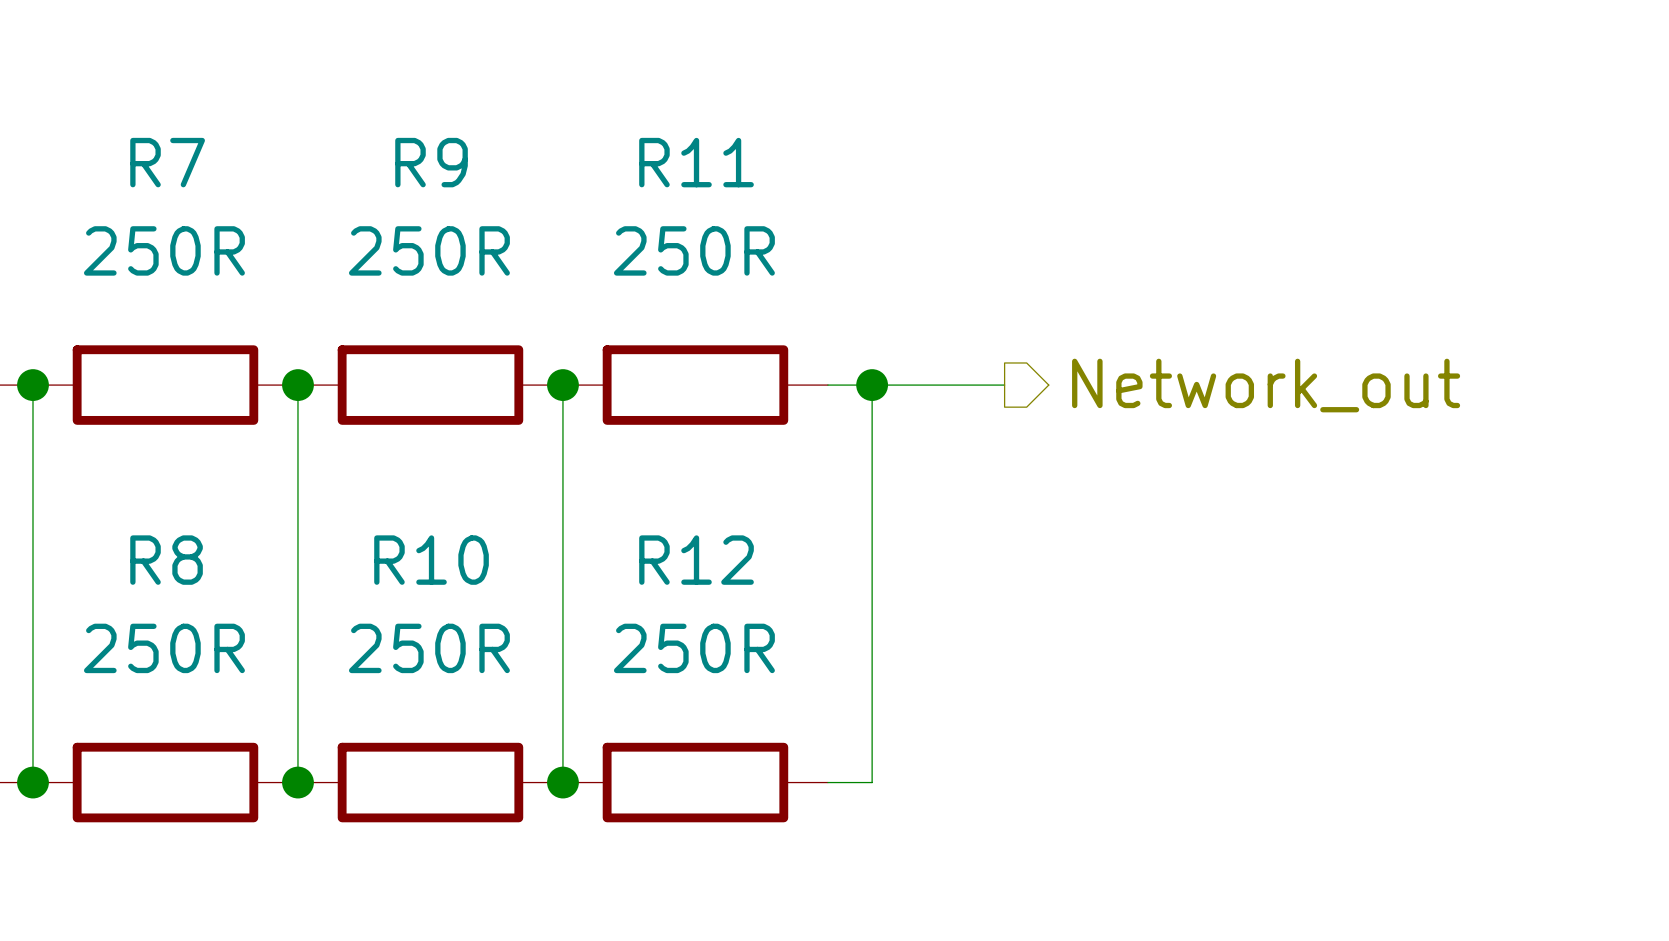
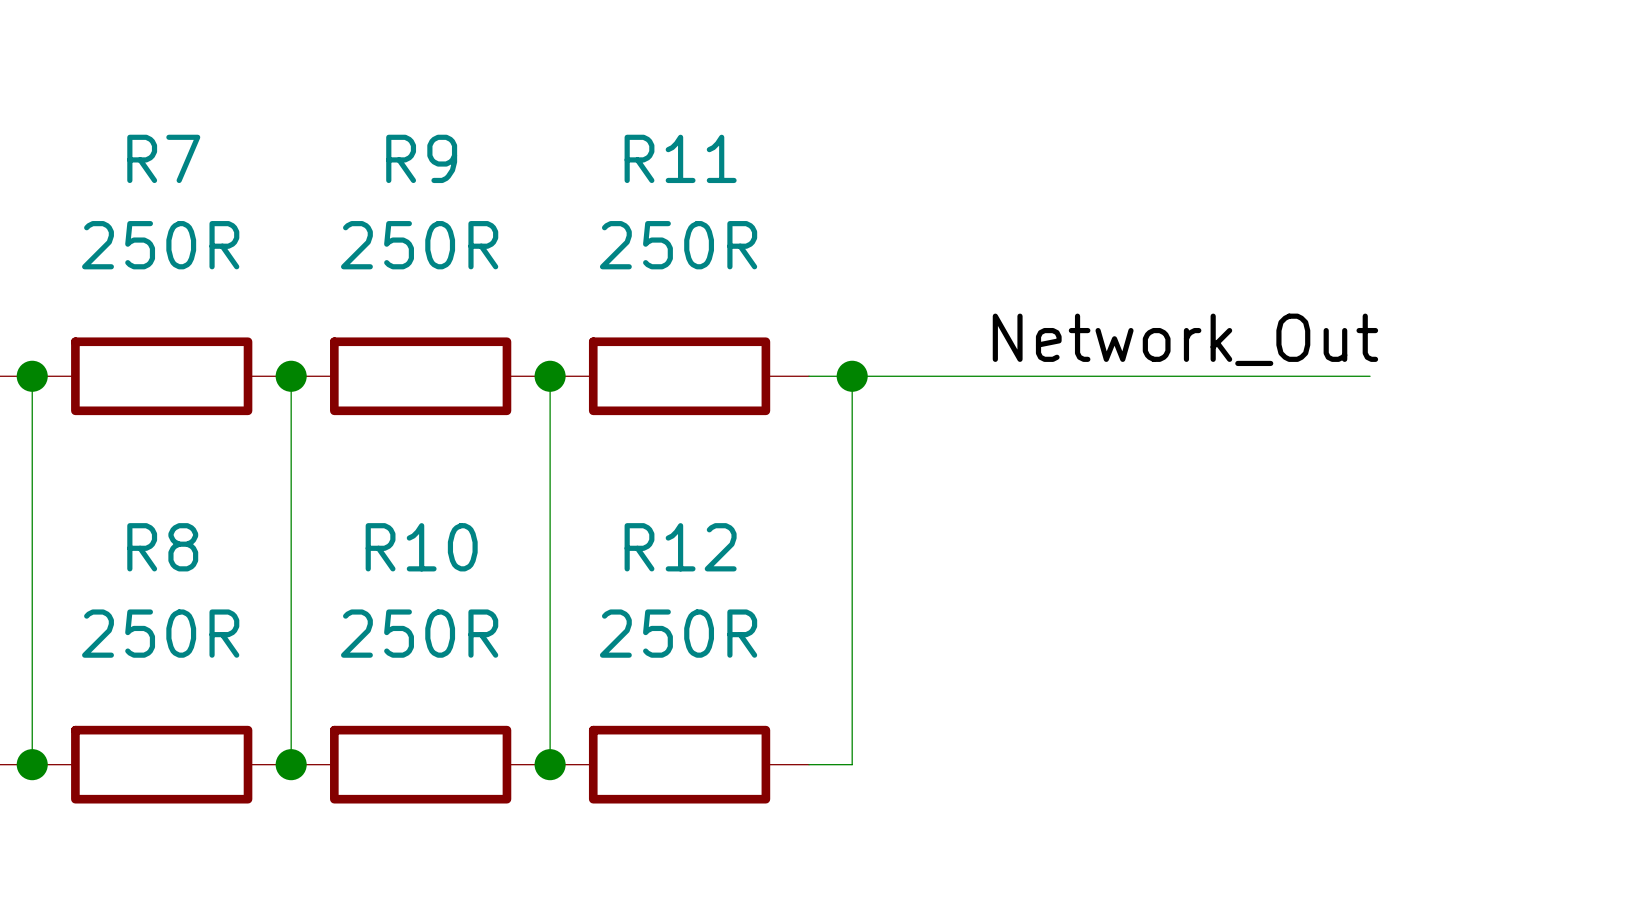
label: none -> Network_Out (1185, 339)
wire: none -> (981, 376) (1370, 376)
hierarchical label: Network_out (1266, 385) -> none

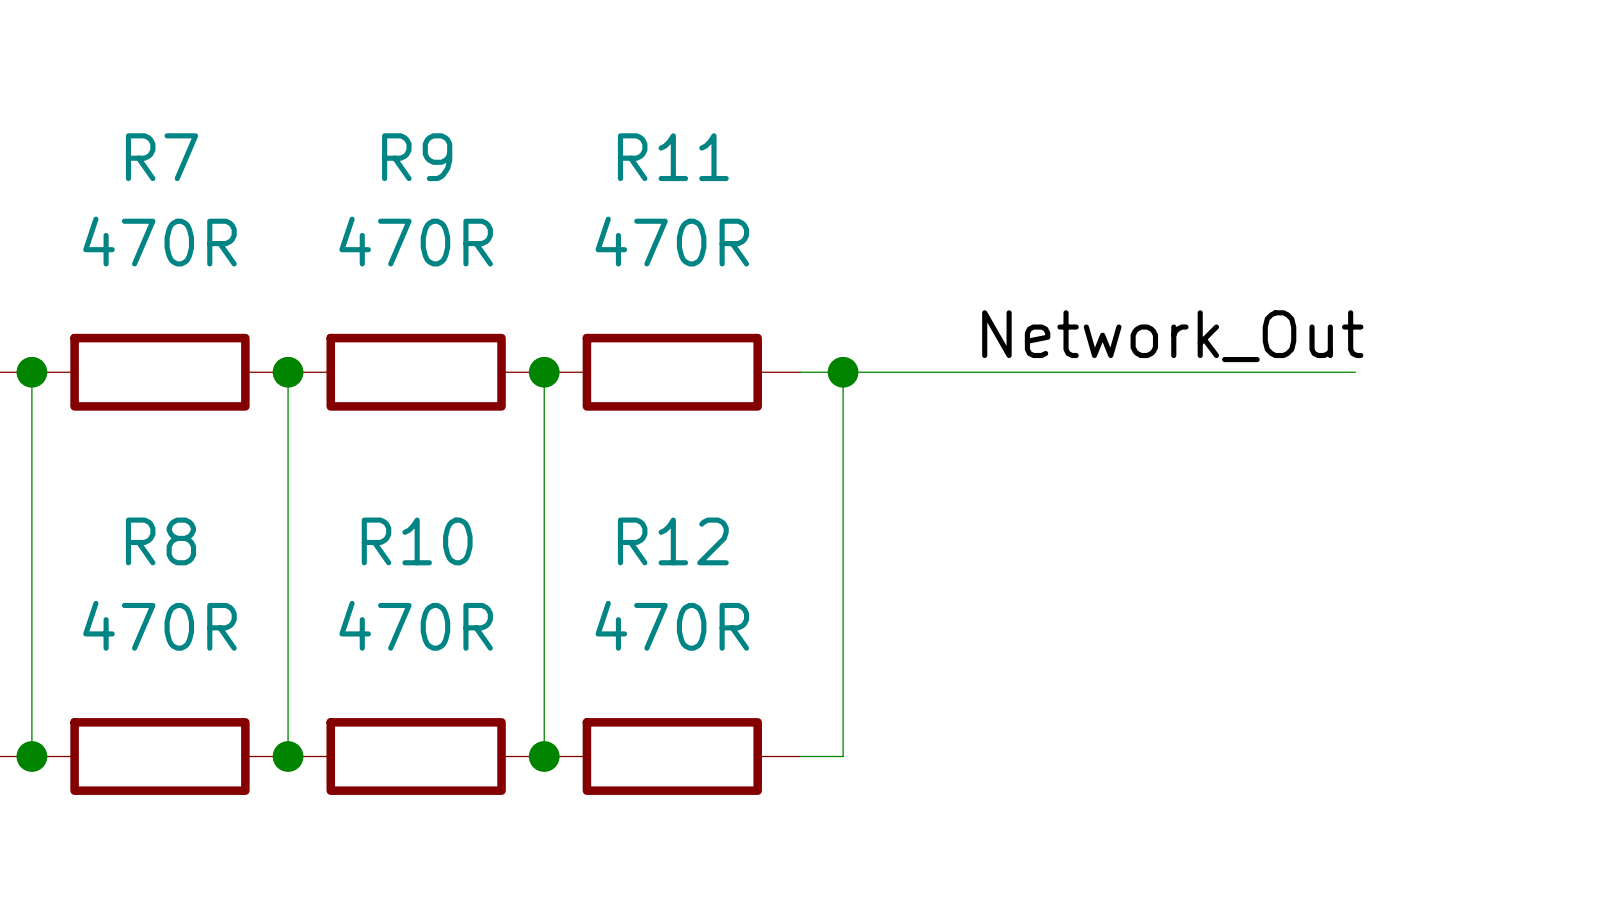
R7 value: 250R (160, 245) -> 470R (159, 241)
R9 value: 250R (419, 245) -> 470R (416, 241)
R11 value: 250R (678, 245) -> 470R (672, 241)
R8 value: 250R (160, 633) -> 470R (159, 625)
R10 value: 250R (419, 633) -> 470R (416, 625)
R12 value: 250R (678, 633) -> 470R (672, 625)

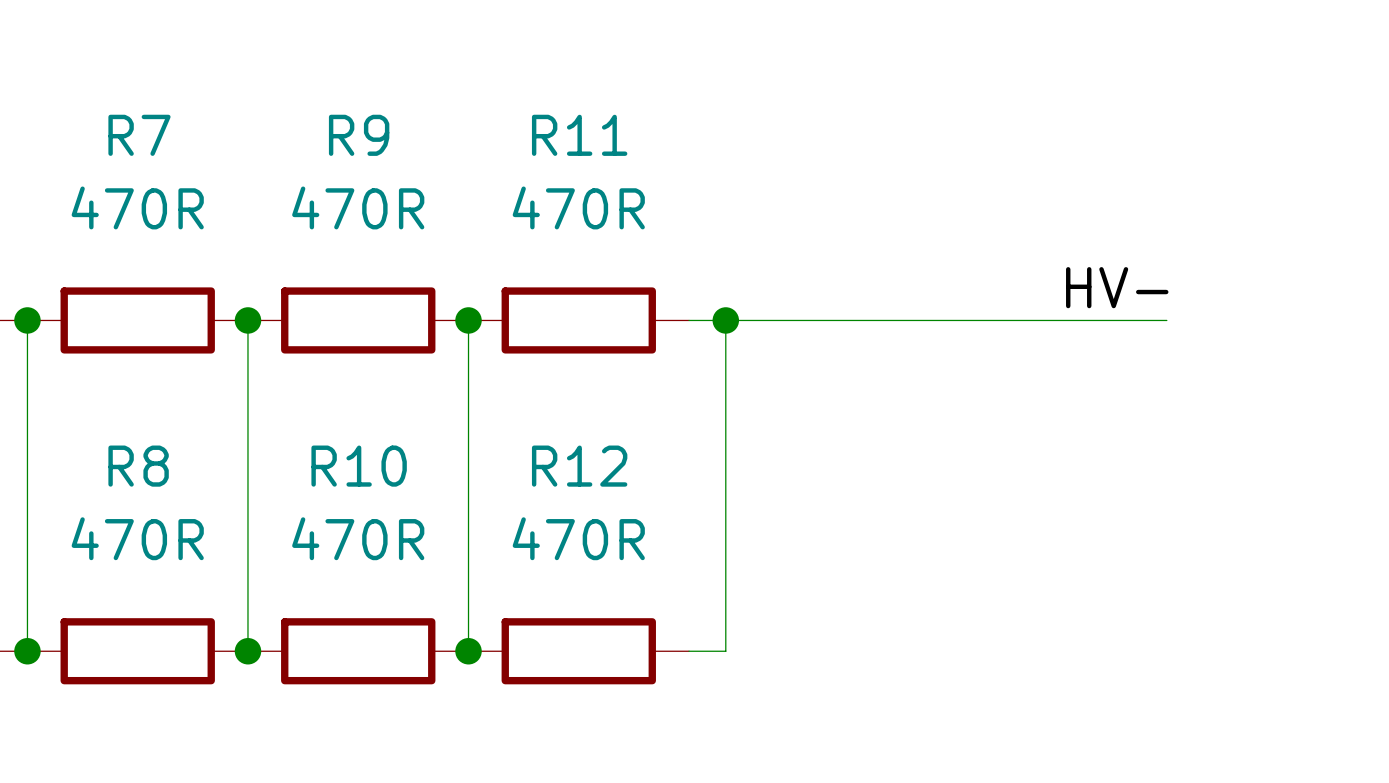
label: none -> HV- (1117, 287)
label: Network_Out (1172, 336) -> none

